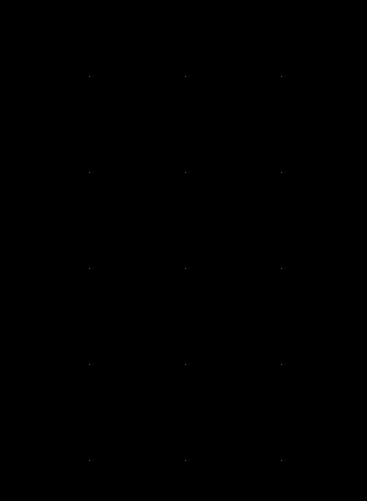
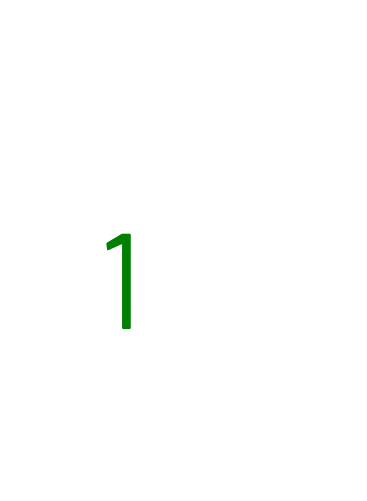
text: none -> 1 (118, 281)

